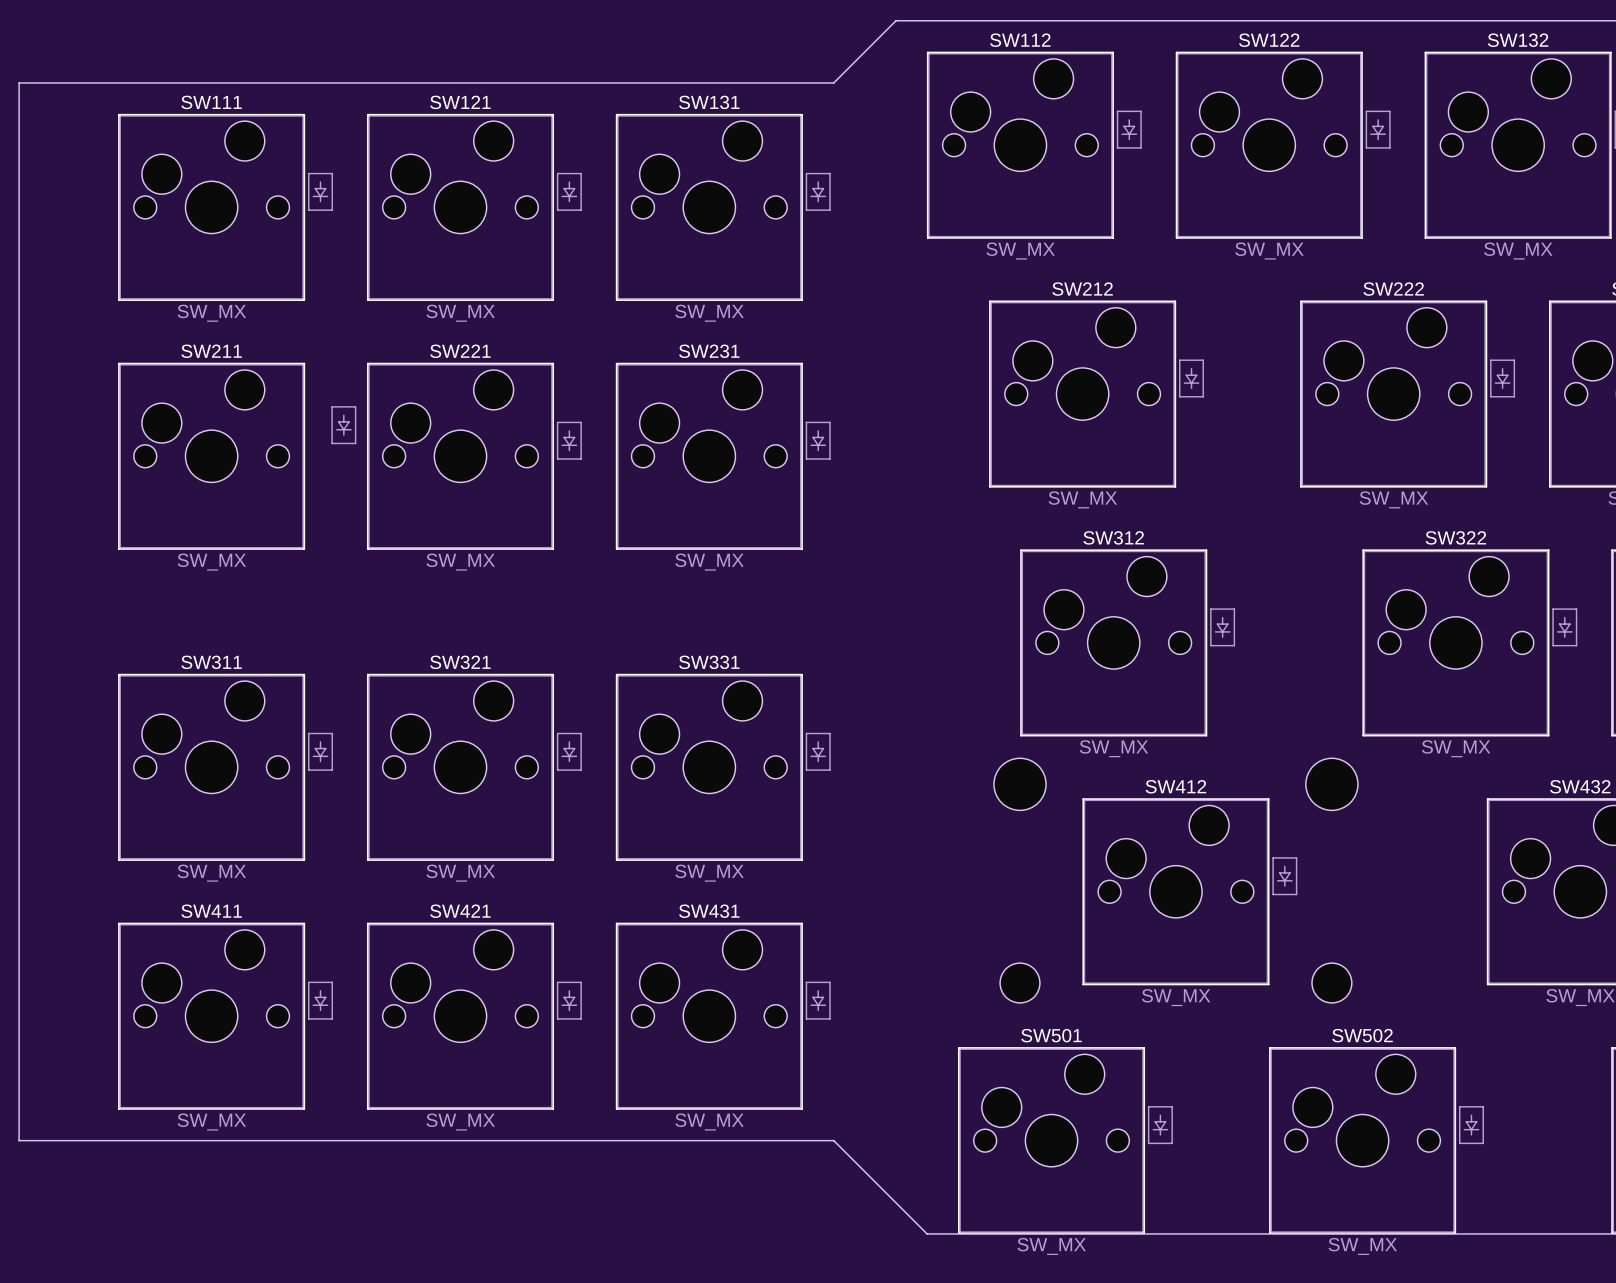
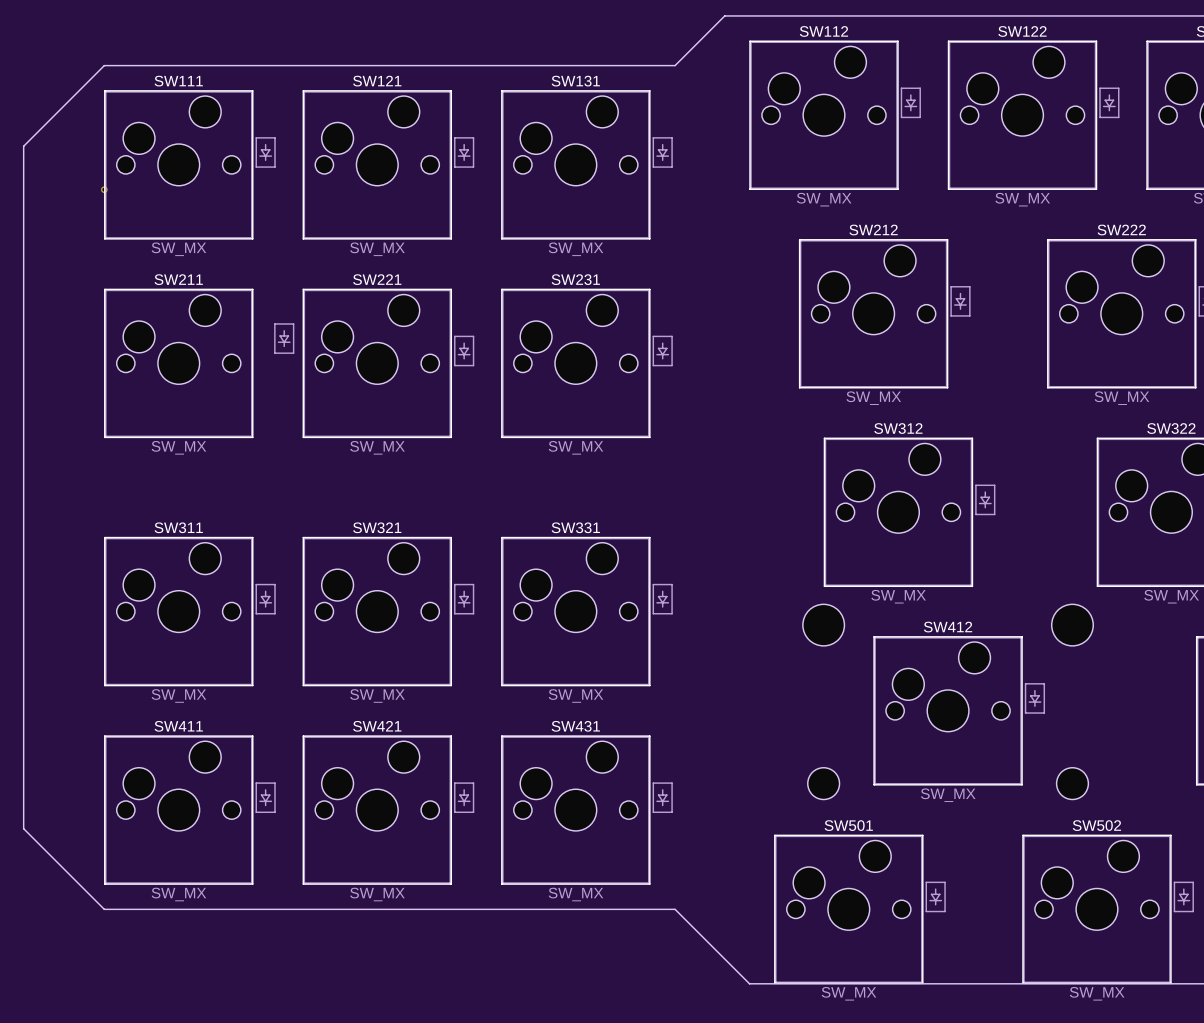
board edge: (118, 82) (19, 82) (19, 1140) (118, 1140) -> (104, 65) (23, 146) (23, 828) (104, 909)
via: none -> (104, 189)

